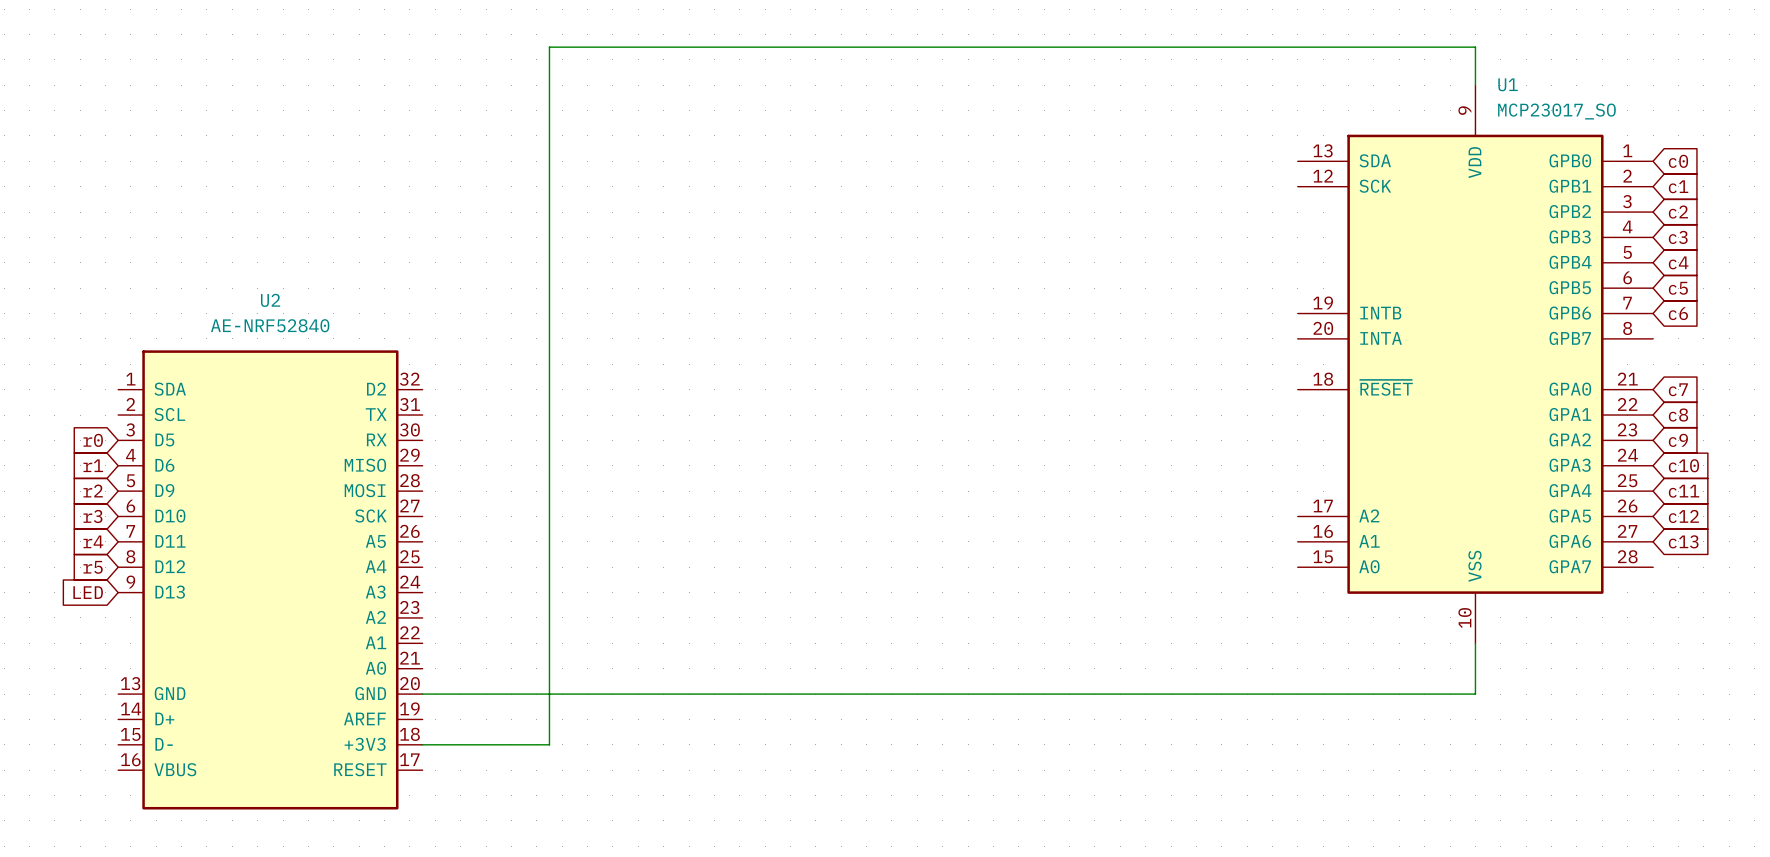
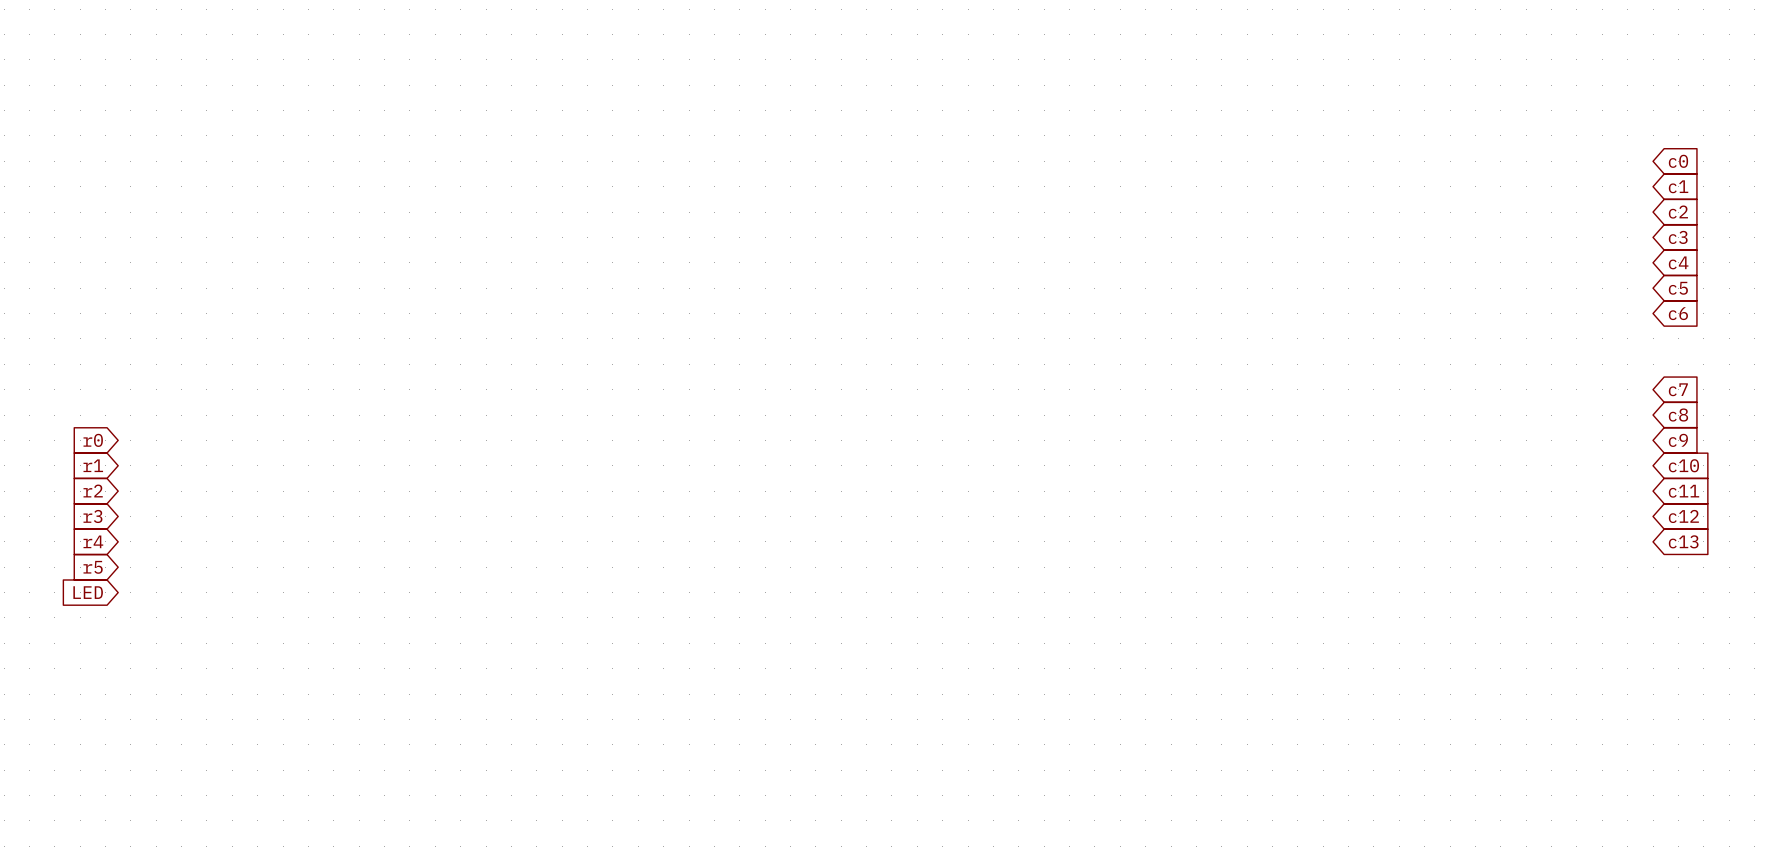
wire: (1475, 85) (1475, 47) (549, 47) (549, 744) (422, 744) -> none
U1: MCP23017_SO (1475, 364) -> none
U2: AE-NRF52840 (270, 579) -> none
wire: (1475, 643) (1475, 694) (422, 694) -> none

